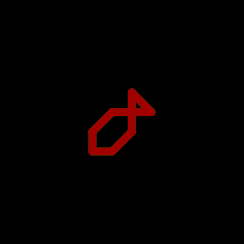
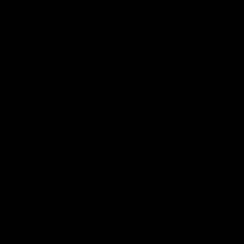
top track: (131, 92) (151, 112) (112, 112) (92, 131) (92, 151) (112, 151) (131, 131) (131, 92) -> none

